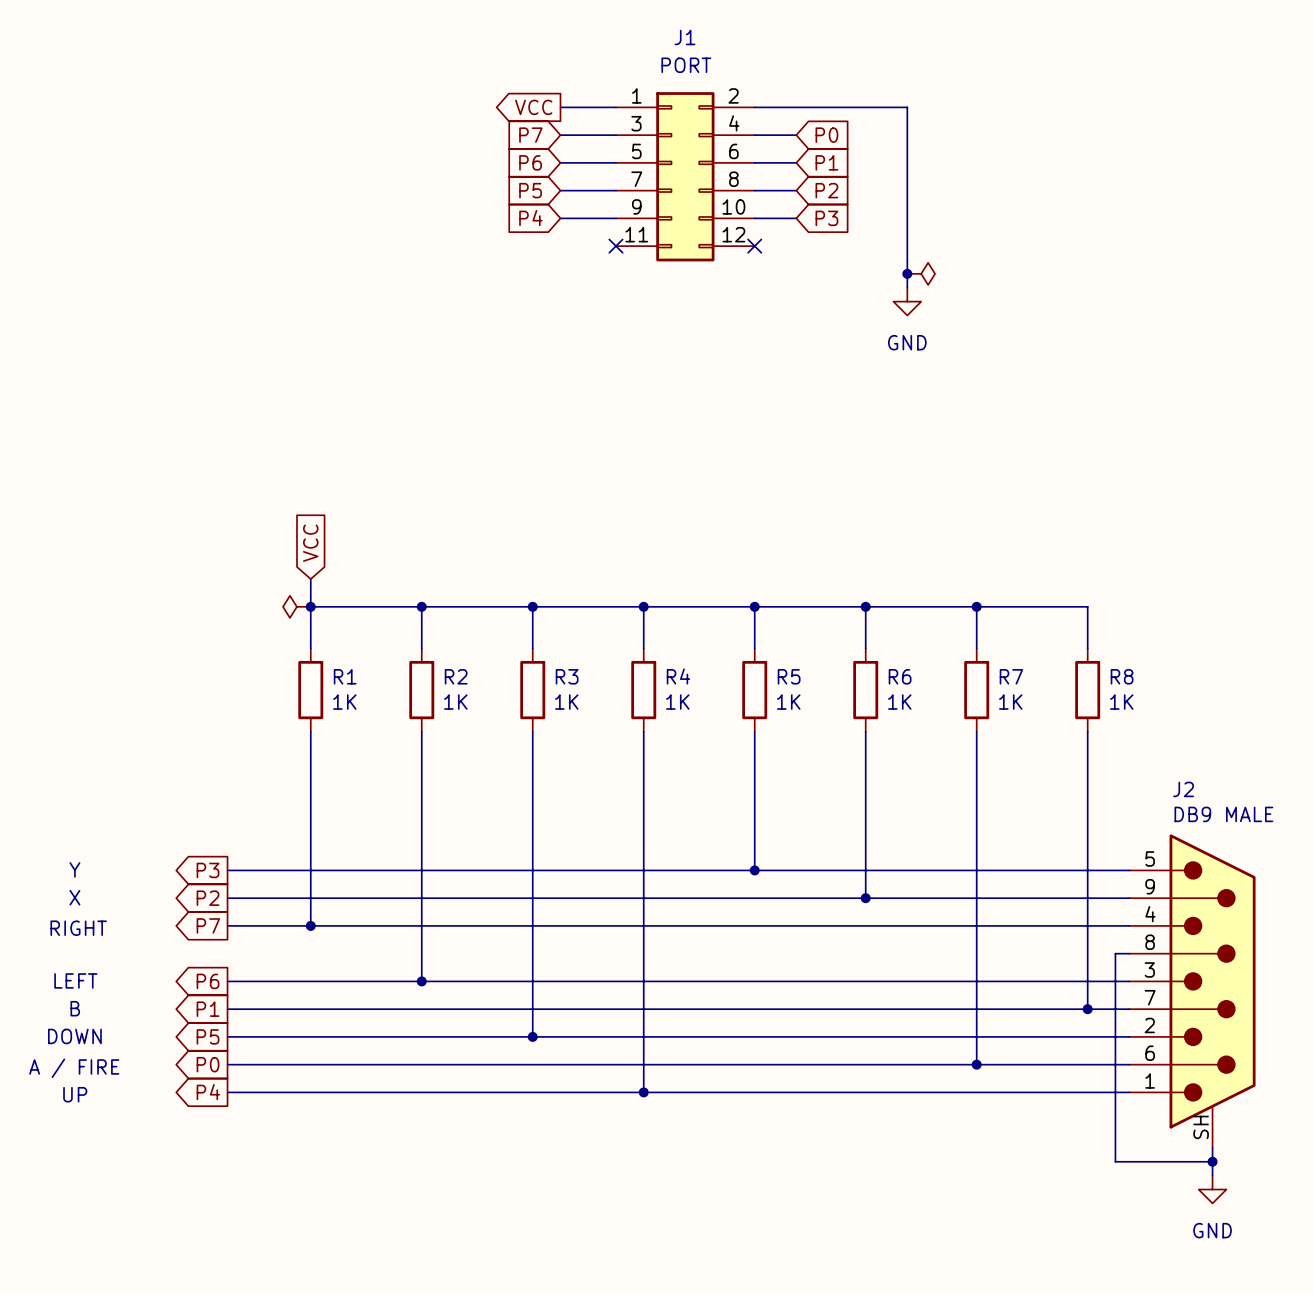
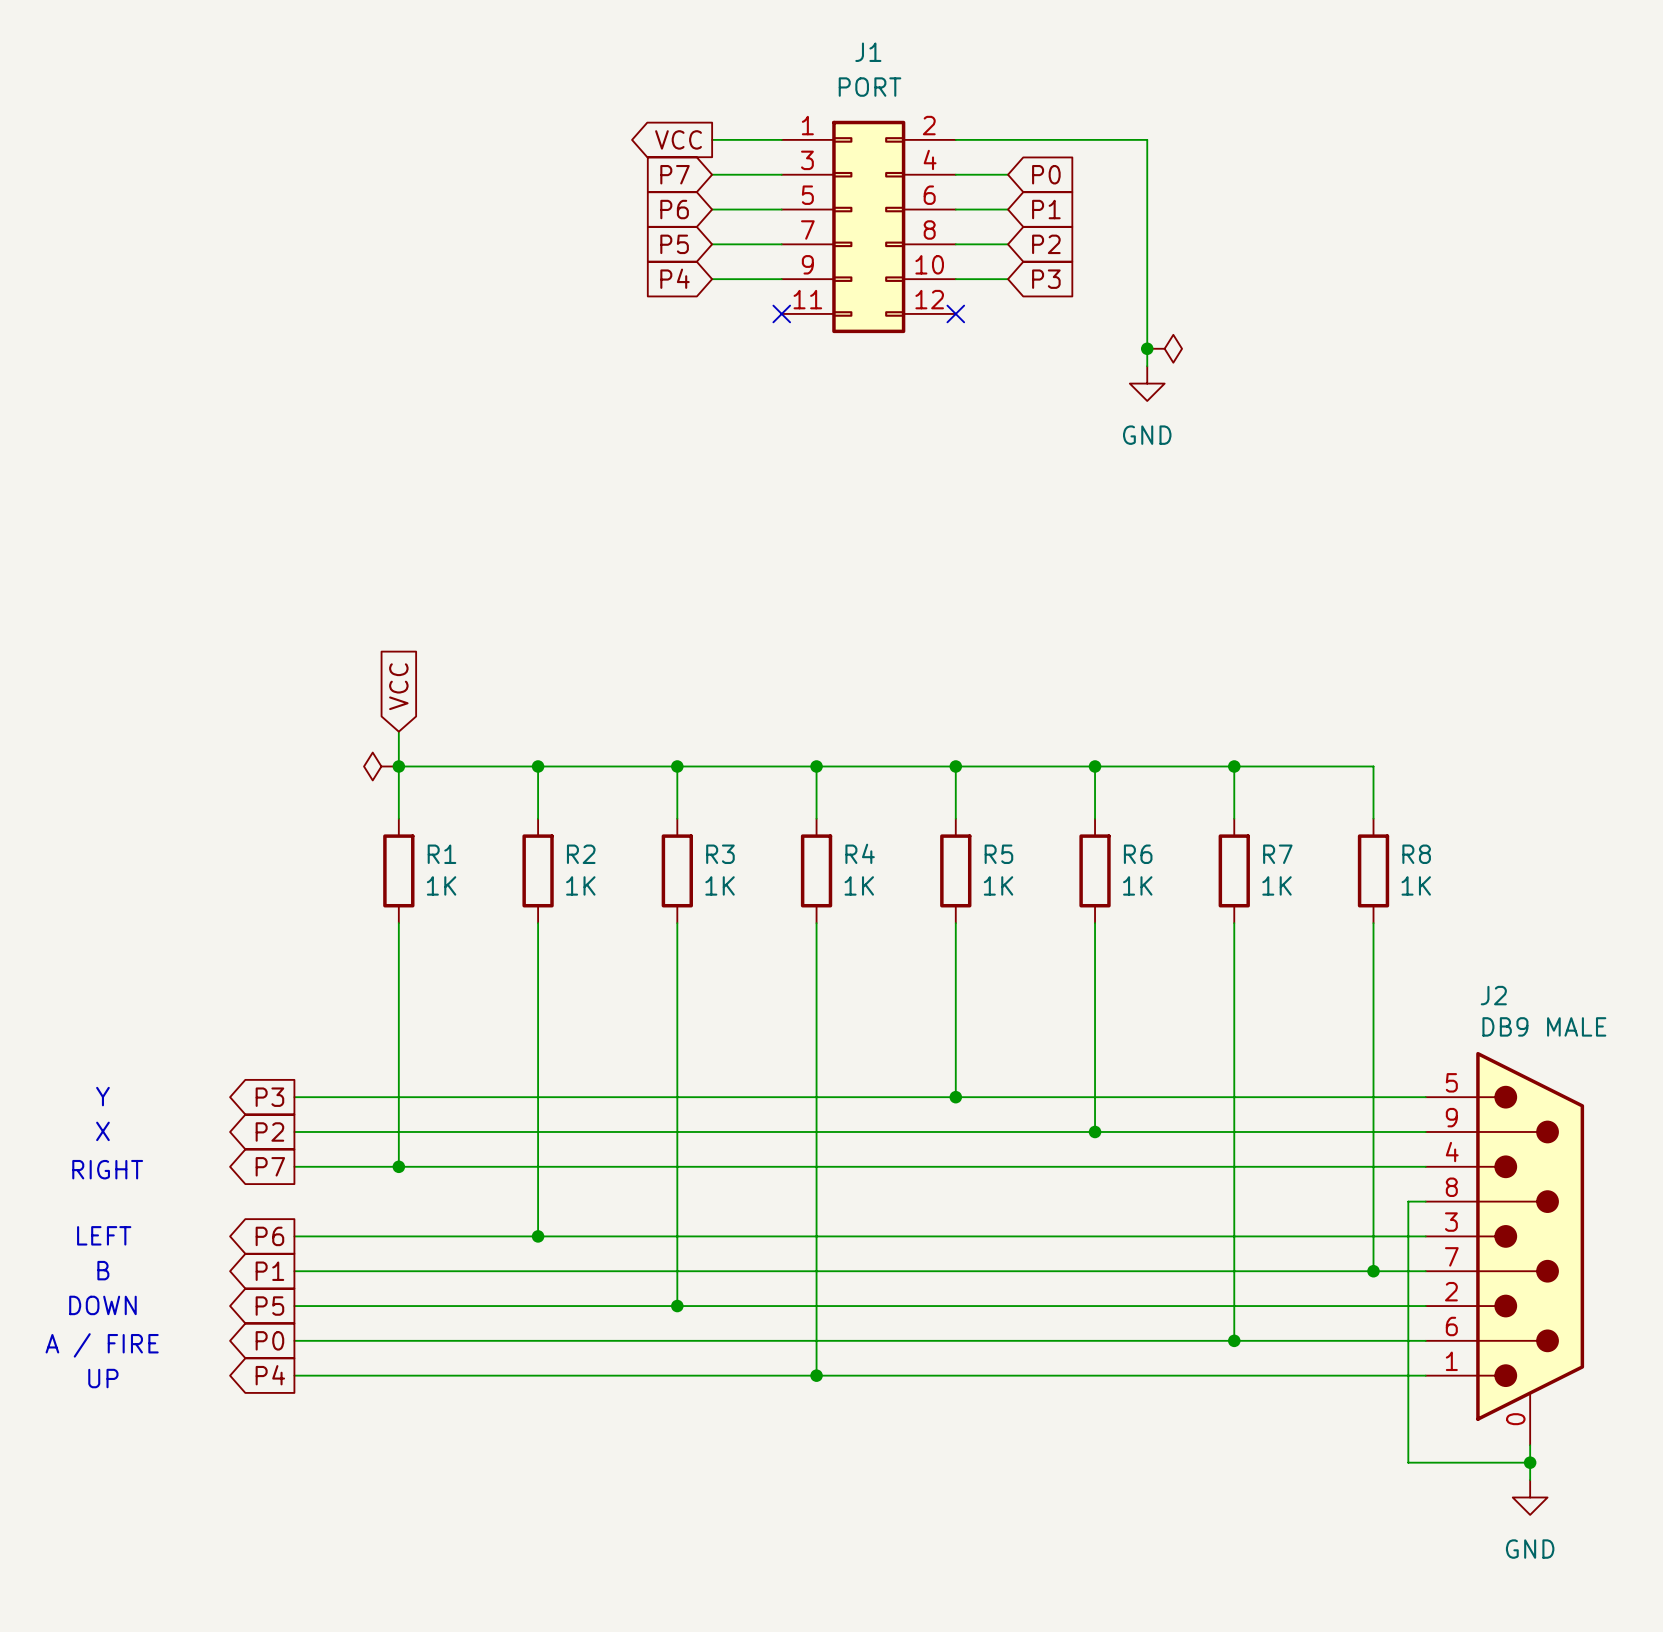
J2 pin number: SH (1201, 1127) -> 0 (1515, 1419)

